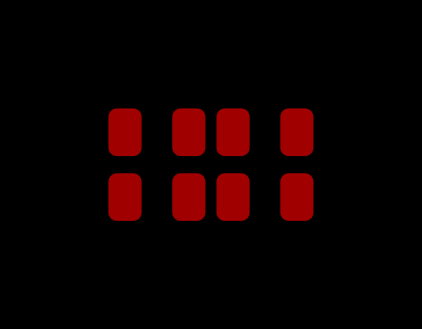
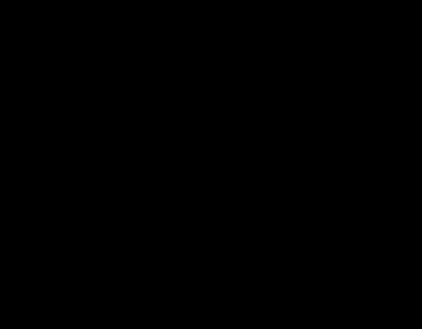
part: (156, 132) -> none
part: (264, 132) -> none
part: (156, 197) -> none
part: (264, 197) -> none

